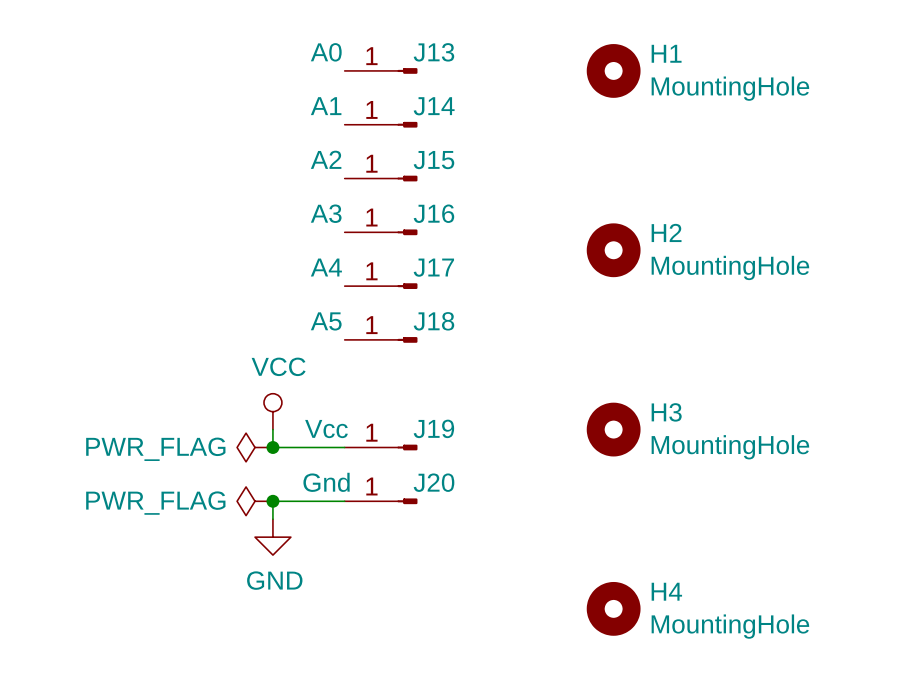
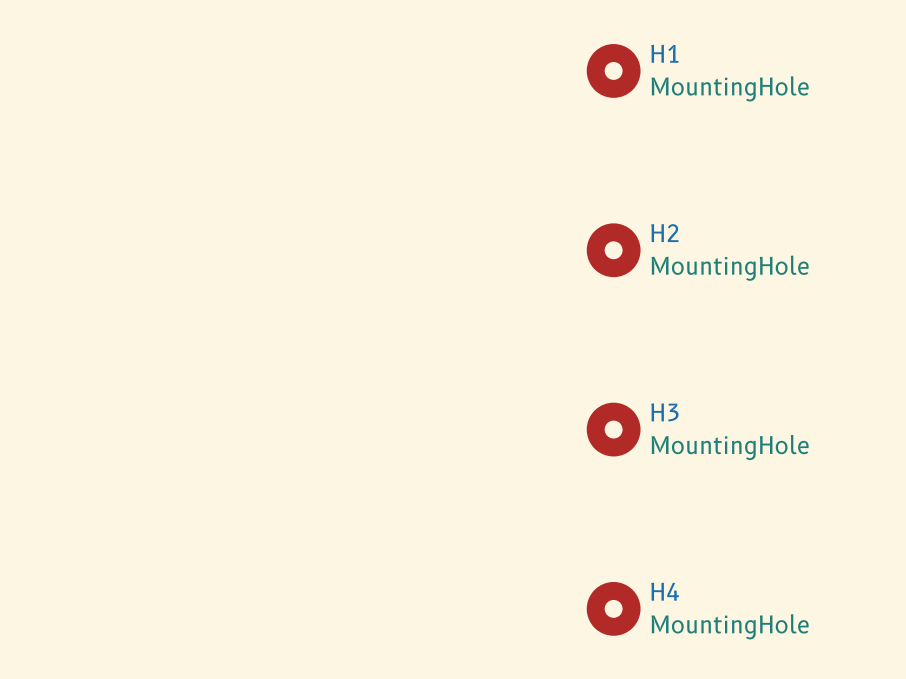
J13: A0 (381, 70) -> none
J14: A1 (381, 124) -> none
J15: A2 (381, 178) -> none
J16: A3 (381, 232) -> none
J17: A4 (381, 286) -> none
J18: A5 (381, 339) -> none
power symbol: VCC (272, 411) -> none
wire: (272, 429) (272, 447) (344, 447) -> none
power symbol: PWR_FLAG (255, 447) -> none
junction: (272, 447) -> none
J19: Vcc (381, 447) -> none
power symbol: PWR_FLAG (255, 501) -> none
junction: (272, 501) -> none
wire: (344, 501) (272, 501) (272, 519) -> none
J20: Gnd (381, 501) -> none
power symbol: GND (272, 537) -> none

